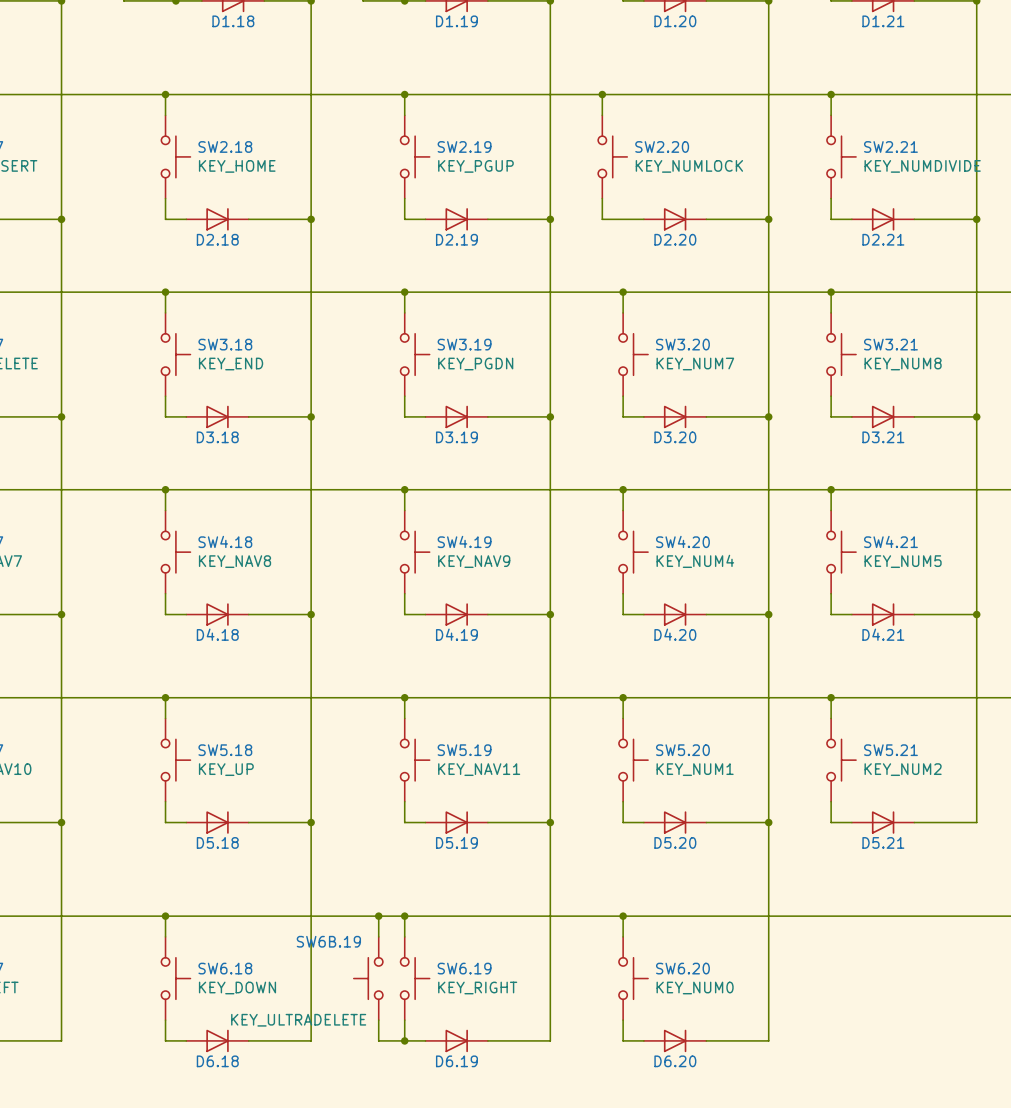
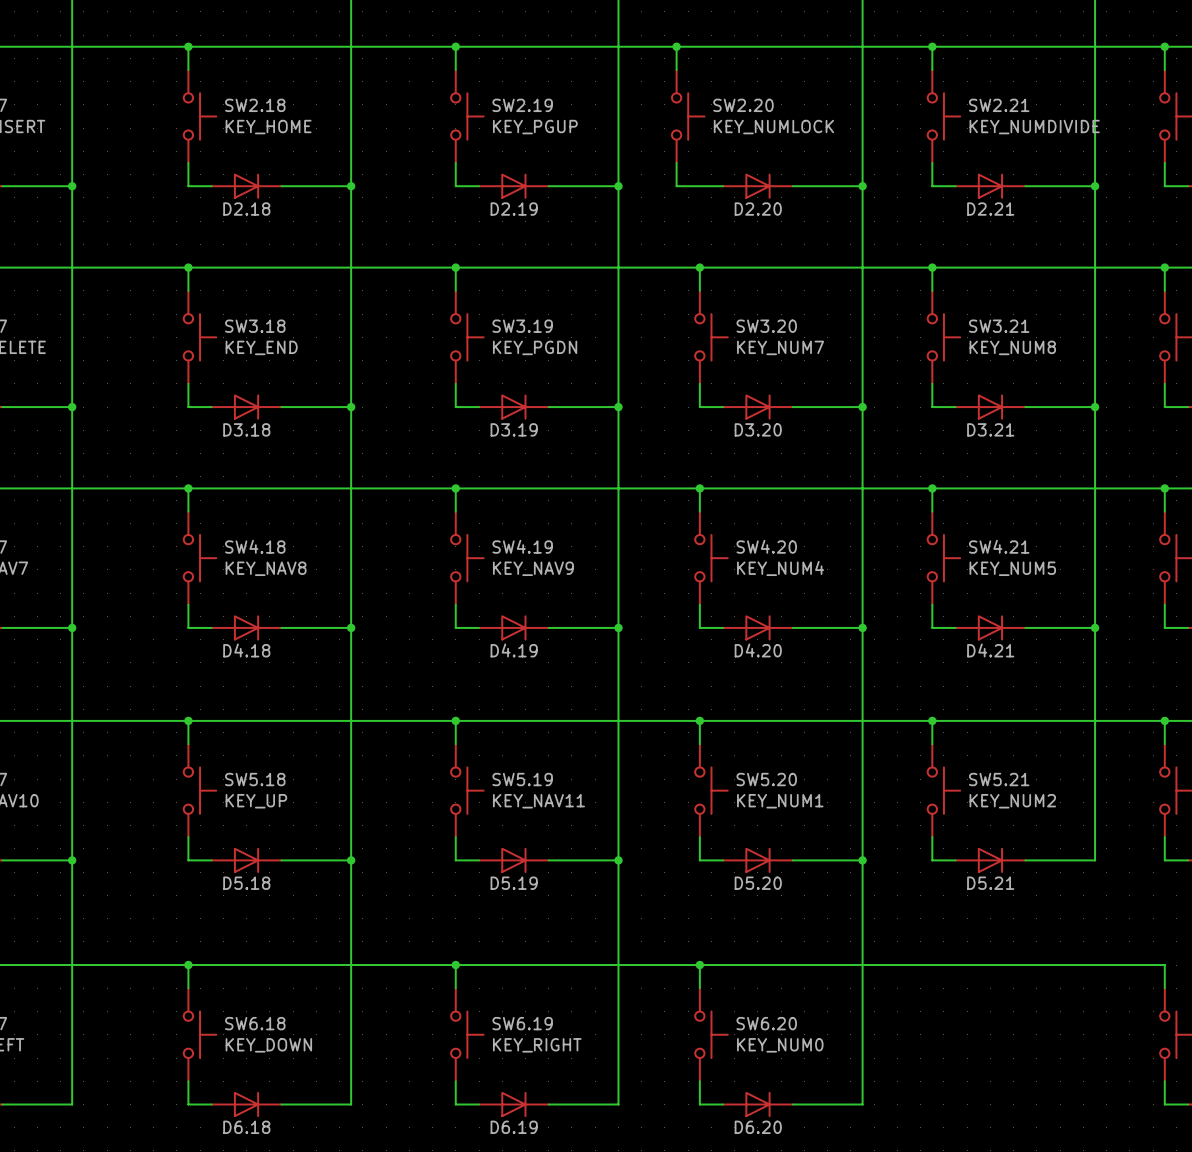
wire: (378, 916) (378, 936) -> none
junction: (378, 916) -> none
SW6B.19: KEY_ULTRADELETE (368, 978) -> none
wire: (378, 1020) (378, 1040) (404, 1040) -> none
junction: (404, 1040) -> none

